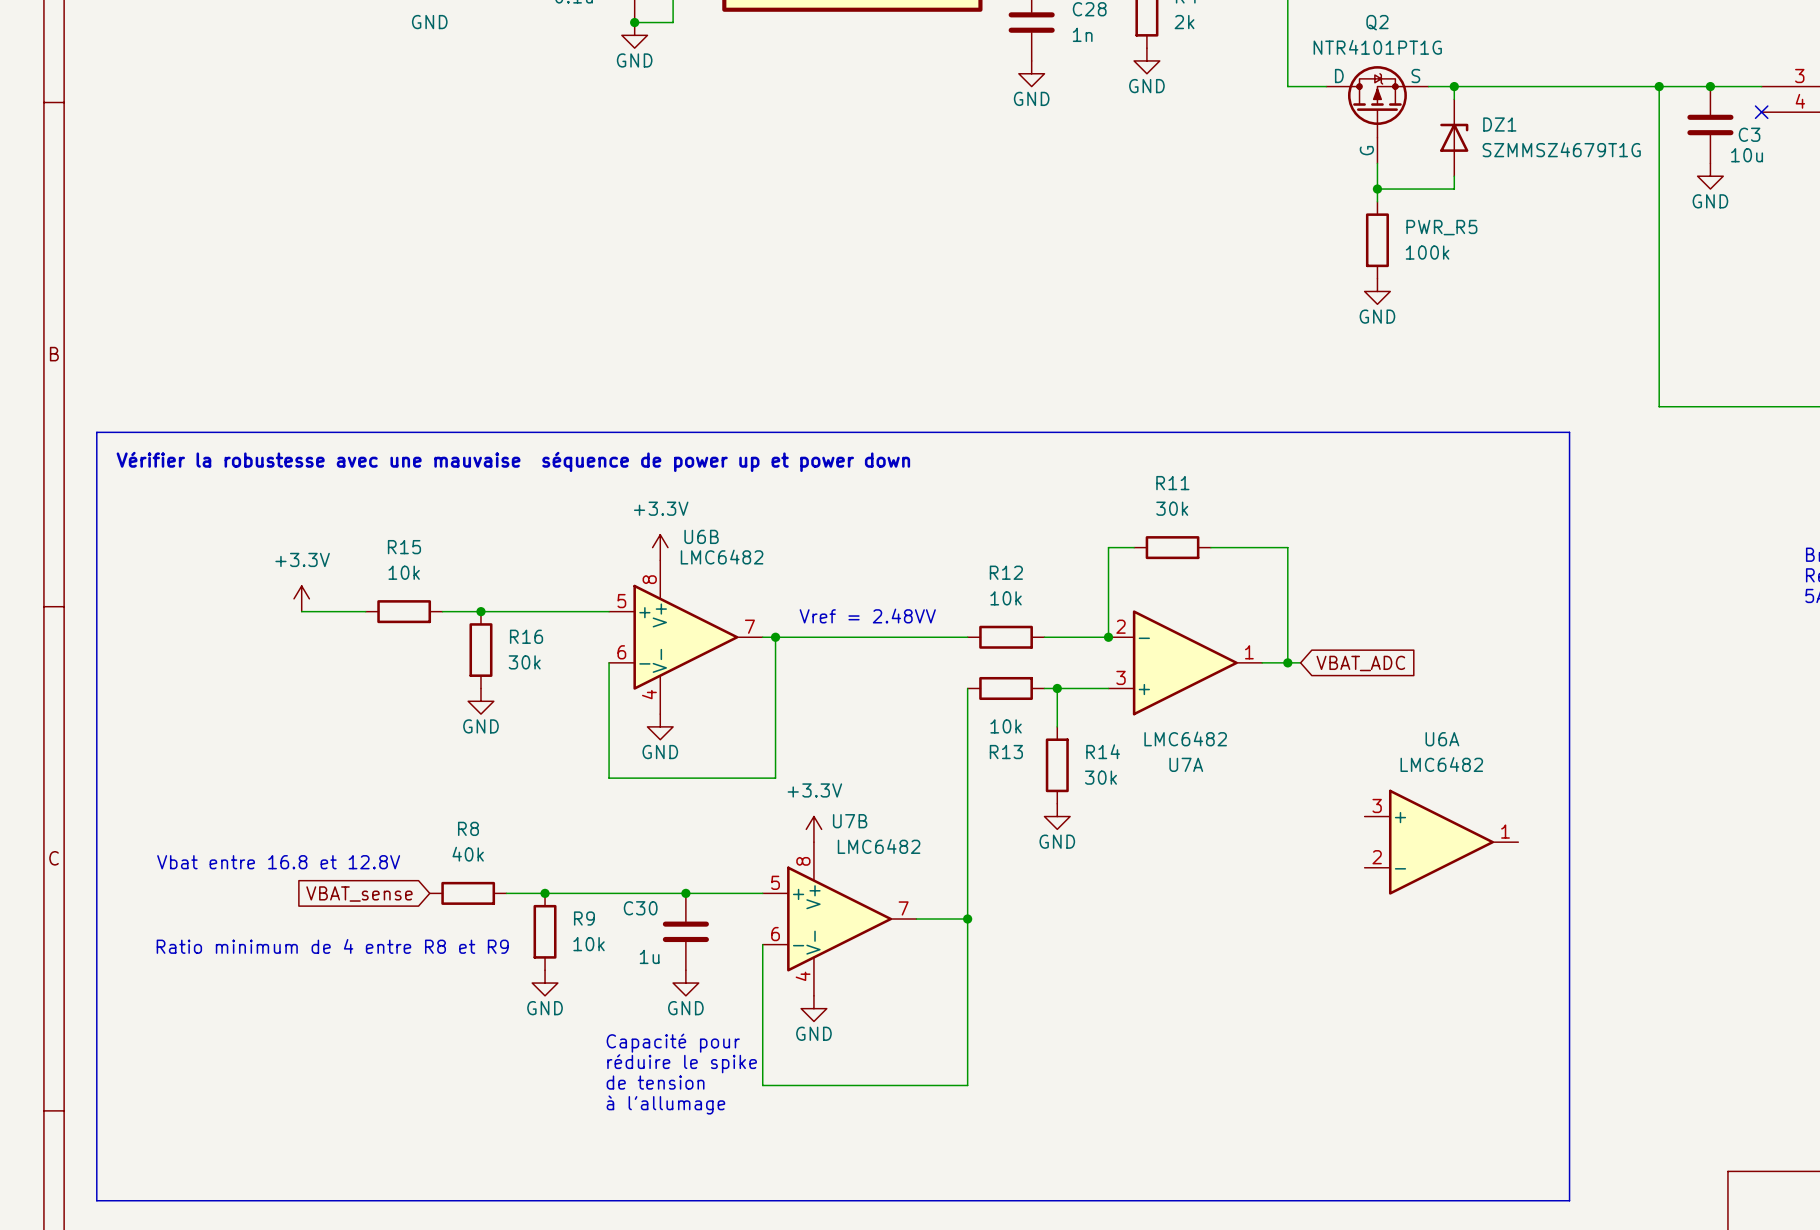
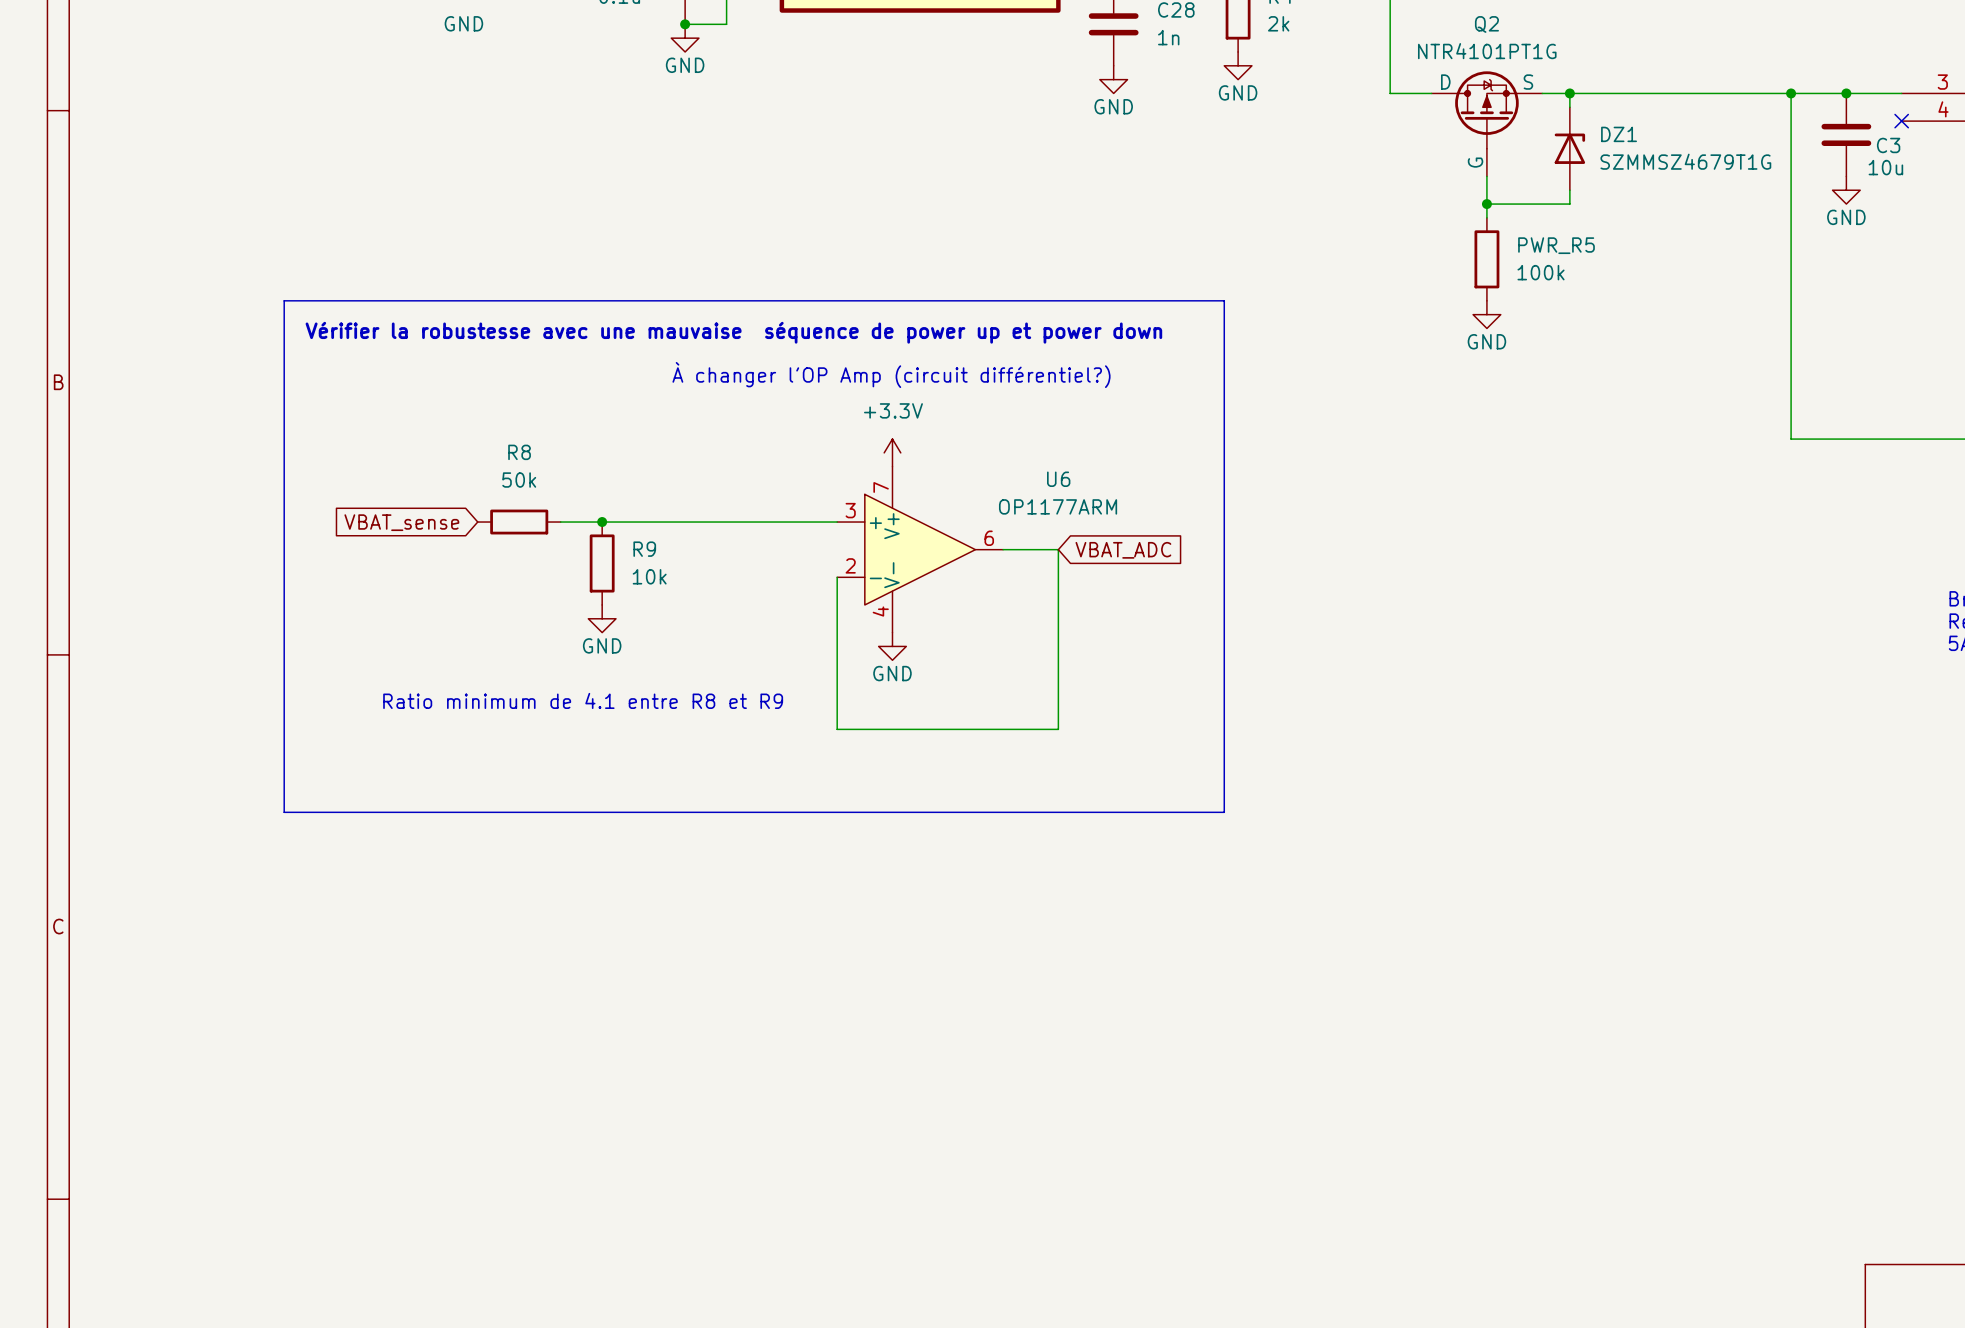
line: none -> (284, 300) (1224, 300) (1224, 812) (284, 812) (284, 300)
text: none -> À changer l'OP Amp (circuit différentiel?) (891, 375)
power symbol: none -> +3.3V (892, 452)
line: (96, 432) (1569, 432) (1569, 1200) (96, 1200) (96, 432) -> none
text position: Vérifier la robustesse avec une mauvaise séquence de power up et power down (513, 461) -> Vérifier la robustesse avec une mauvaise séquence de power up et power down (733, 332)
wire: none -> (560, 522) (837, 522)
junction: none -> (602, 522)
global label: none -> VBAT_sense (401, 522)
U6: none -> OP1177ARM (920, 549)
global label: none -> VBAT_ADC (1123, 550)
wire: none -> (837, 577) (837, 687)
power symbol: +3.3V (660, 547) -> none
wire: (1134, 547) (1108, 547) (1108, 637) (1044, 637) -> none
R11: 30k (1172, 547) -> none
wire: (1210, 547) (1287, 547) (1287, 662) -> none
power symbol: none -> GND (602, 618)
power symbol: +3.3V (301, 598) -> none
power symbol: none -> GND (892, 646)
wire: (301, 611) (365, 611) -> none
R15: 10k (404, 611) -> none
wire: (442, 611) (609, 611) -> none
junction: (480, 611) -> none
text: Vref = 2.48VV (867, 616) -> none
part: (660, 637) -> none
U6B: LMC6482 (685, 637) -> none
wire: (762, 637) (967, 637) -> none
junction: (775, 637) -> none
R12: 10k (1006, 637) -> none
junction: (1108, 637) -> none
text: none -> Ratio minimum de 4.1 entre R8 et R9 (583, 700)
R16: 30k (480, 650) -> none
wire: (609, 662) (609, 778) (775, 778) (775, 675) -> (1003, 549) (1058, 549) (1058, 729) (837, 729)
U7A: LMC6482 (1185, 662) -> none
wire: (1262, 662) (1300, 662) -> none
junction: (1287, 662) -> none
global label: VBAT_ADC (1360, 663) -> none
wire: (967, 688) (967, 1085) (762, 1085) (762, 944) -> none
R13: 10k (1006, 688) -> none
wire: (1044, 688) (1108, 688) -> none
wire: (1057, 688) (1057, 726) -> none
junction: (1057, 688) -> none
power symbol: GND (480, 701) -> none
power symbol: GND (660, 726) -> none
R14: 30k (1057, 765) -> none
power symbol: GND (1057, 816) -> none
power symbol: +3.3V (813, 829) -> none
U6A: LMC6482 (1441, 842) -> none
R8 value: 40k (468, 854) -> 50k (519, 480)
text: Vbat entre 16.8 et 12.8V (278, 862) -> none
R8 position: (468, 893) -> (519, 522)
wire: (506, 893) (762, 893) -> none
junction: (545, 893) -> none
junction: (685, 893) -> none
global label: VBAT_sense (359, 894) -> none
part: LMC6482 (813, 919) -> none
U7B: (839, 919) -> none
wire: (916, 919) (967, 919) -> none
junction: (967, 919) -> none
R9 position: (545, 931) -> (602, 563)
C30: 1u (685, 931) -> none
text: Ratio minimum de 4 entre R8 et R9 (332, 946) -> none
power symbol: GND (545, 983) -> none
power symbol: GND (685, 983) -> none
power symbol: GND (813, 1008) -> none
text: Capacité pour (673, 1043) -> none
text: réduire le spike (682, 1063) -> none
text: de tension (655, 1082) -> none
text: à l'allumage (665, 1105) -> none

